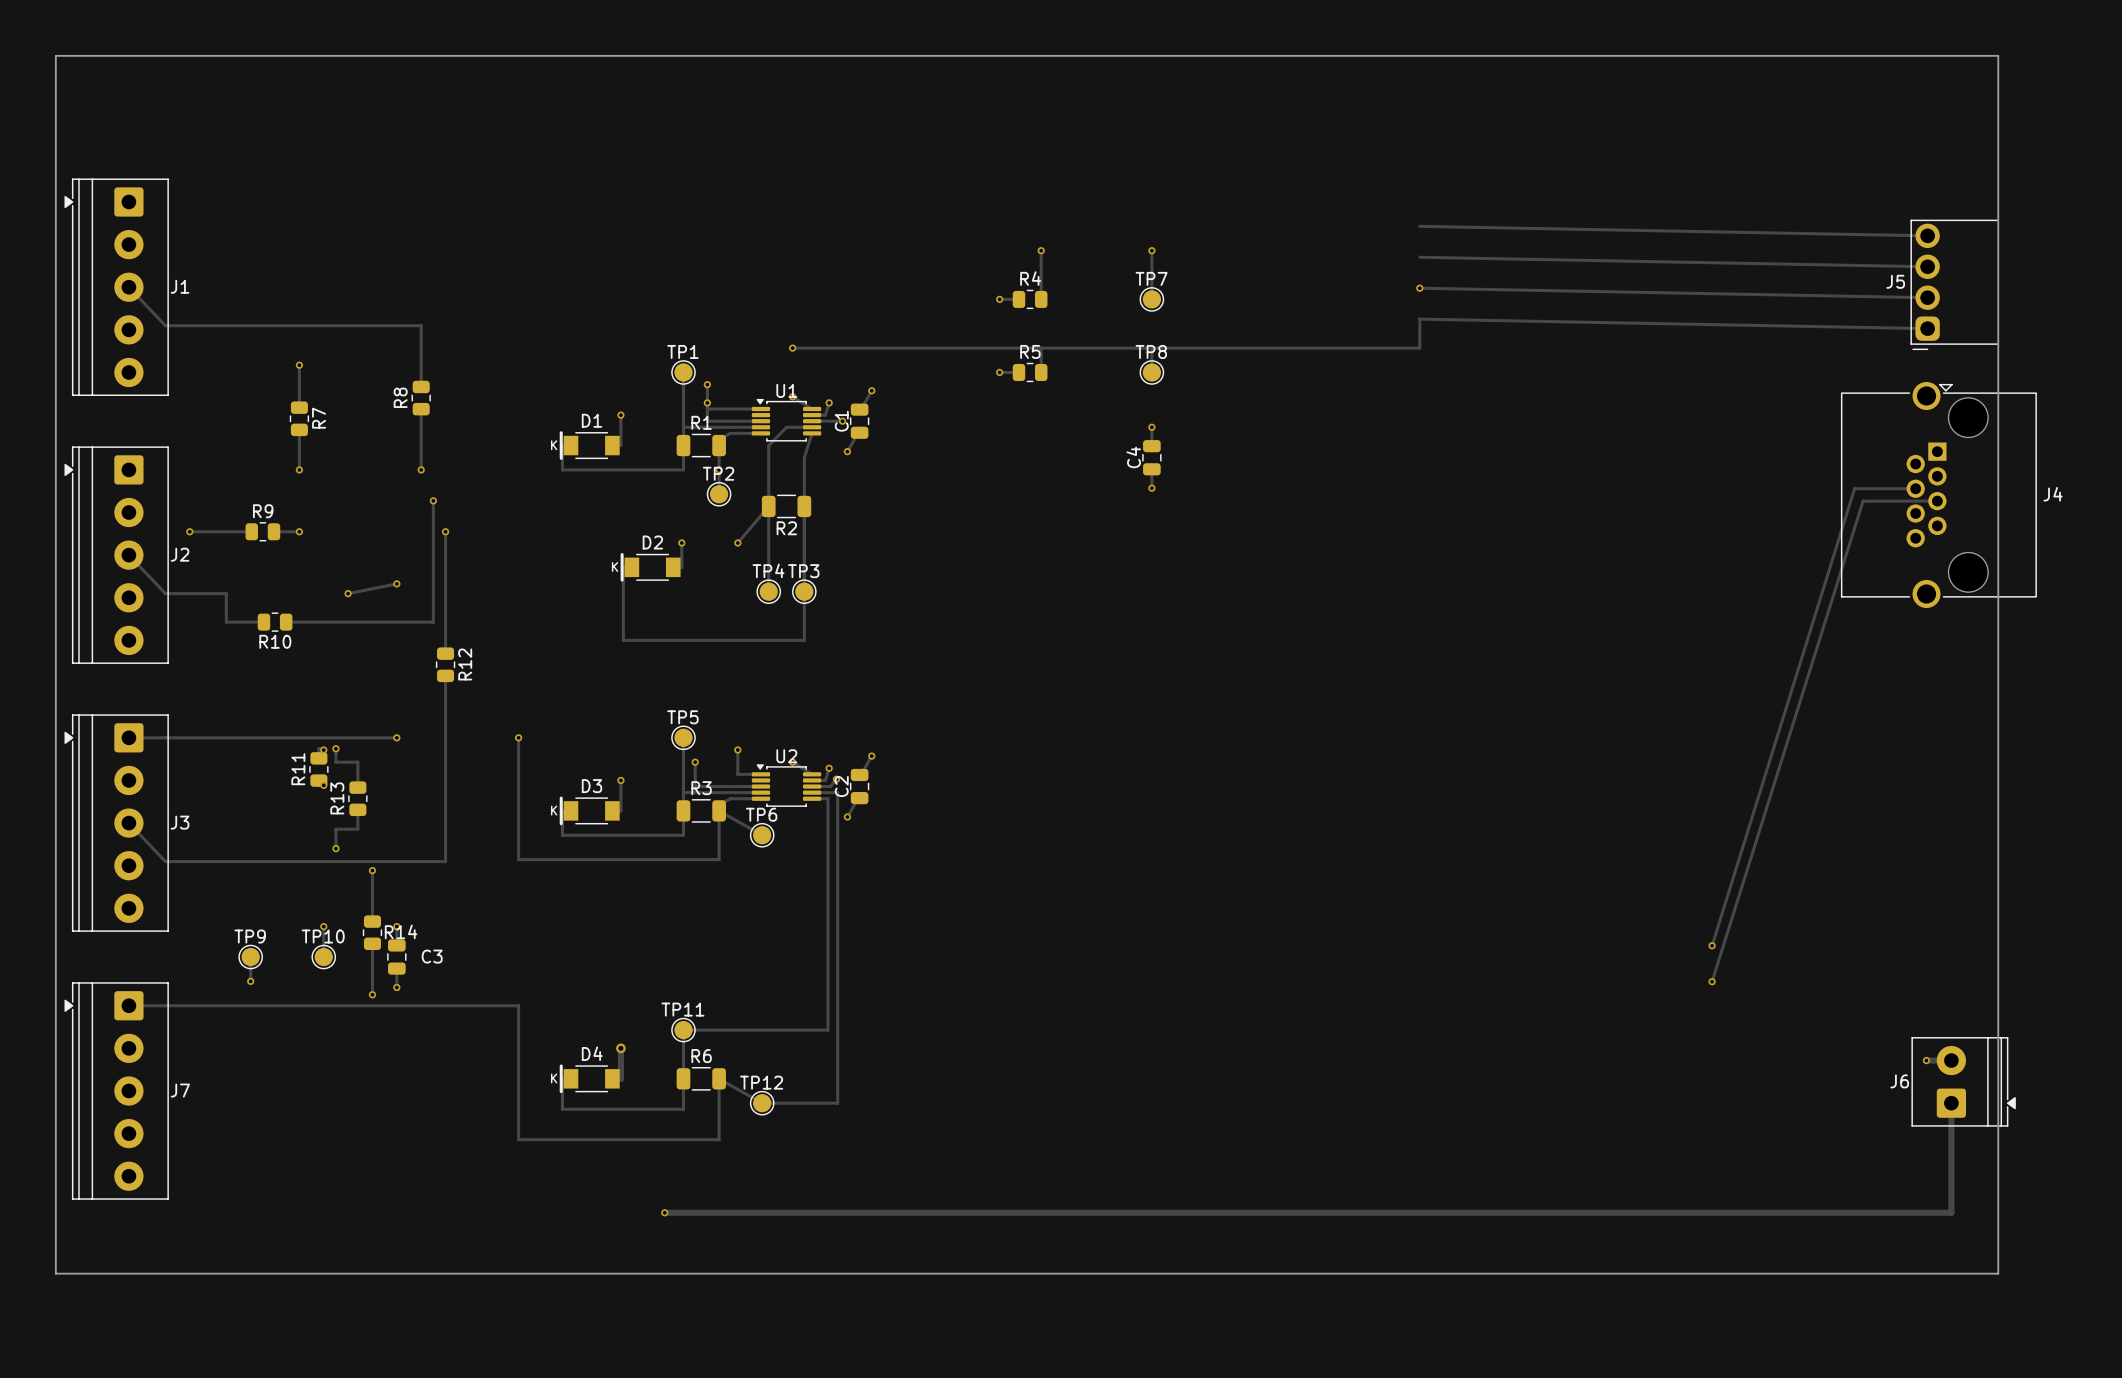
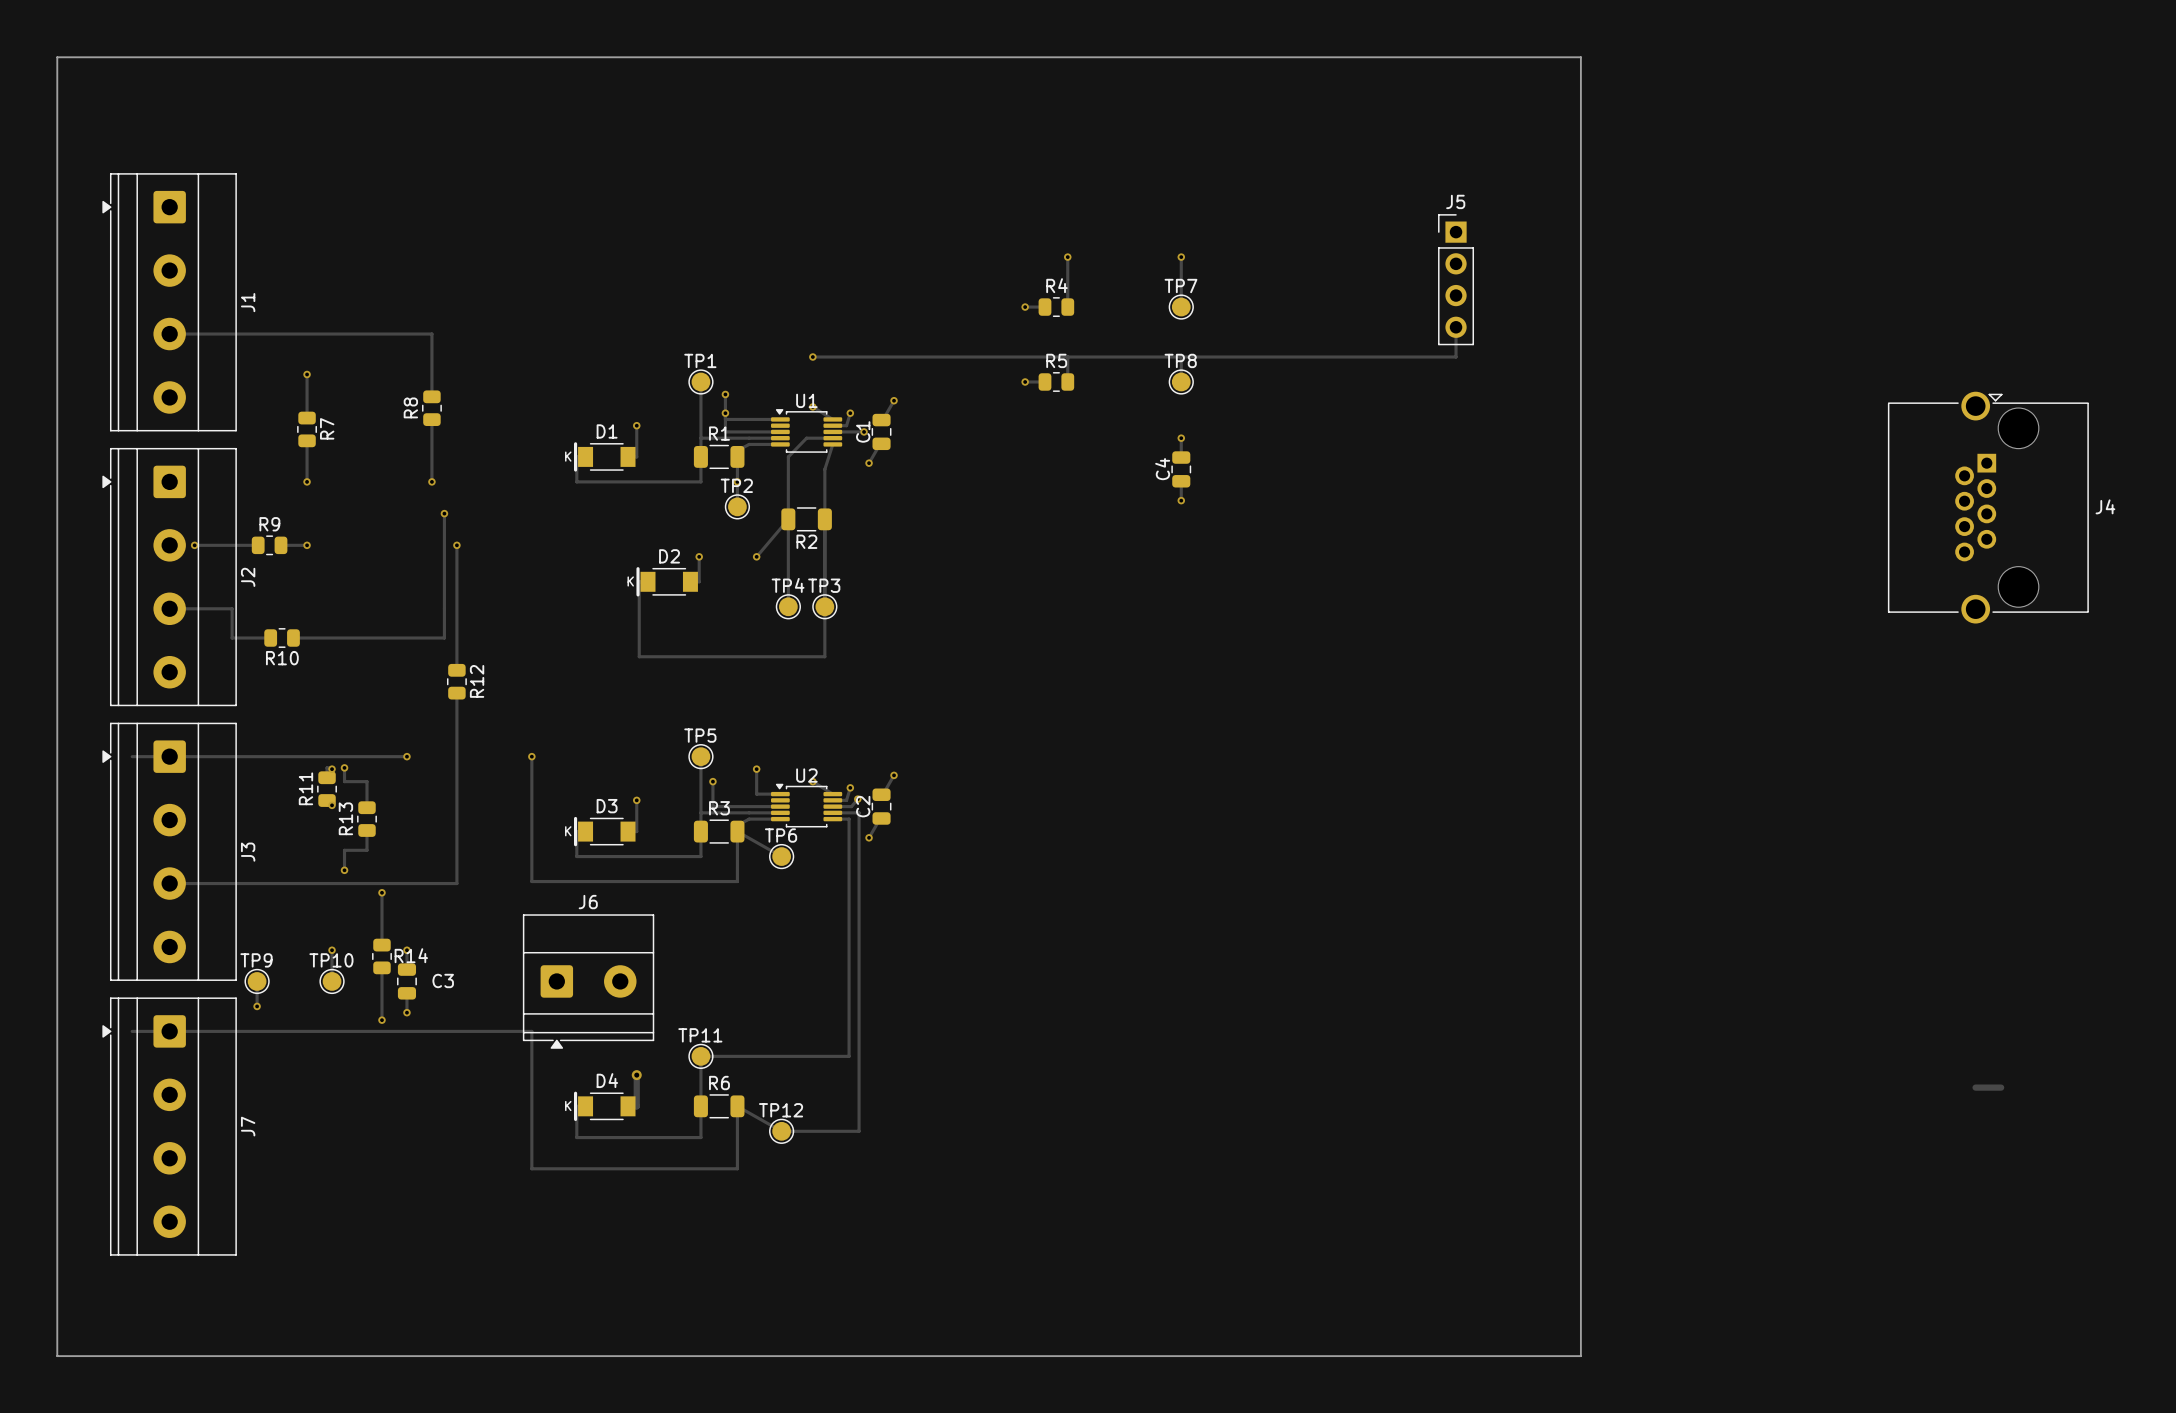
board edge: (1541, 55) (1998, 55) (1998, 1273) (55, 1273) -> (1580, 57) (1580, 1356) (57, 1356) (57, 1306)
J1 footprint: [64, 178, 169, 396] -> [102, 173, 237, 432]
J5 footprint: [1910, 219, 1998, 351] -> [1438, 214, 1475, 346]
track: (1419, 226) (1927, 235) -> none
track: (1419, 257) (1927, 266) -> none
J5 name position: J5 (1895, 281) -> J5 (1455, 201)
track: (128, 287) (165, 325) -> none
track: (1419, 288) (1927, 297) -> none
via: (1419, 288) -> none
track: (1419, 319) (1927, 328) -> none
J2 footprint: [64, 446, 169, 664] -> [102, 447, 237, 707]
track: (1915, 488) (1854, 488) (1712, 945) -> none
track: (1937, 501) (1863, 501) (1712, 981) -> none
track: (128, 555) (165, 593) -> none
track: (396, 583) (348, 593) -> none
via: (396, 583) -> none
via: (348, 593) -> none
J3 footprint: [64, 714, 169, 932] -> [102, 722, 237, 981]
track: (128, 823) (165, 861) -> none
via: (1712, 945) -> none
via: (1712, 981) -> none
J7 footprint: [64, 982, 169, 1200] -> [102, 997, 237, 1256]
J6 footprint: [1911, 1037, 2016, 1127] -> [522, 914, 655, 1049]
via: (1926, 1060) -> none
J6 name position: J6 (1899, 1081) -> J6 (588, 902)
track: (1951, 1103) (1951, 1212) (664, 1212) -> none
via: (664, 1212) -> none

